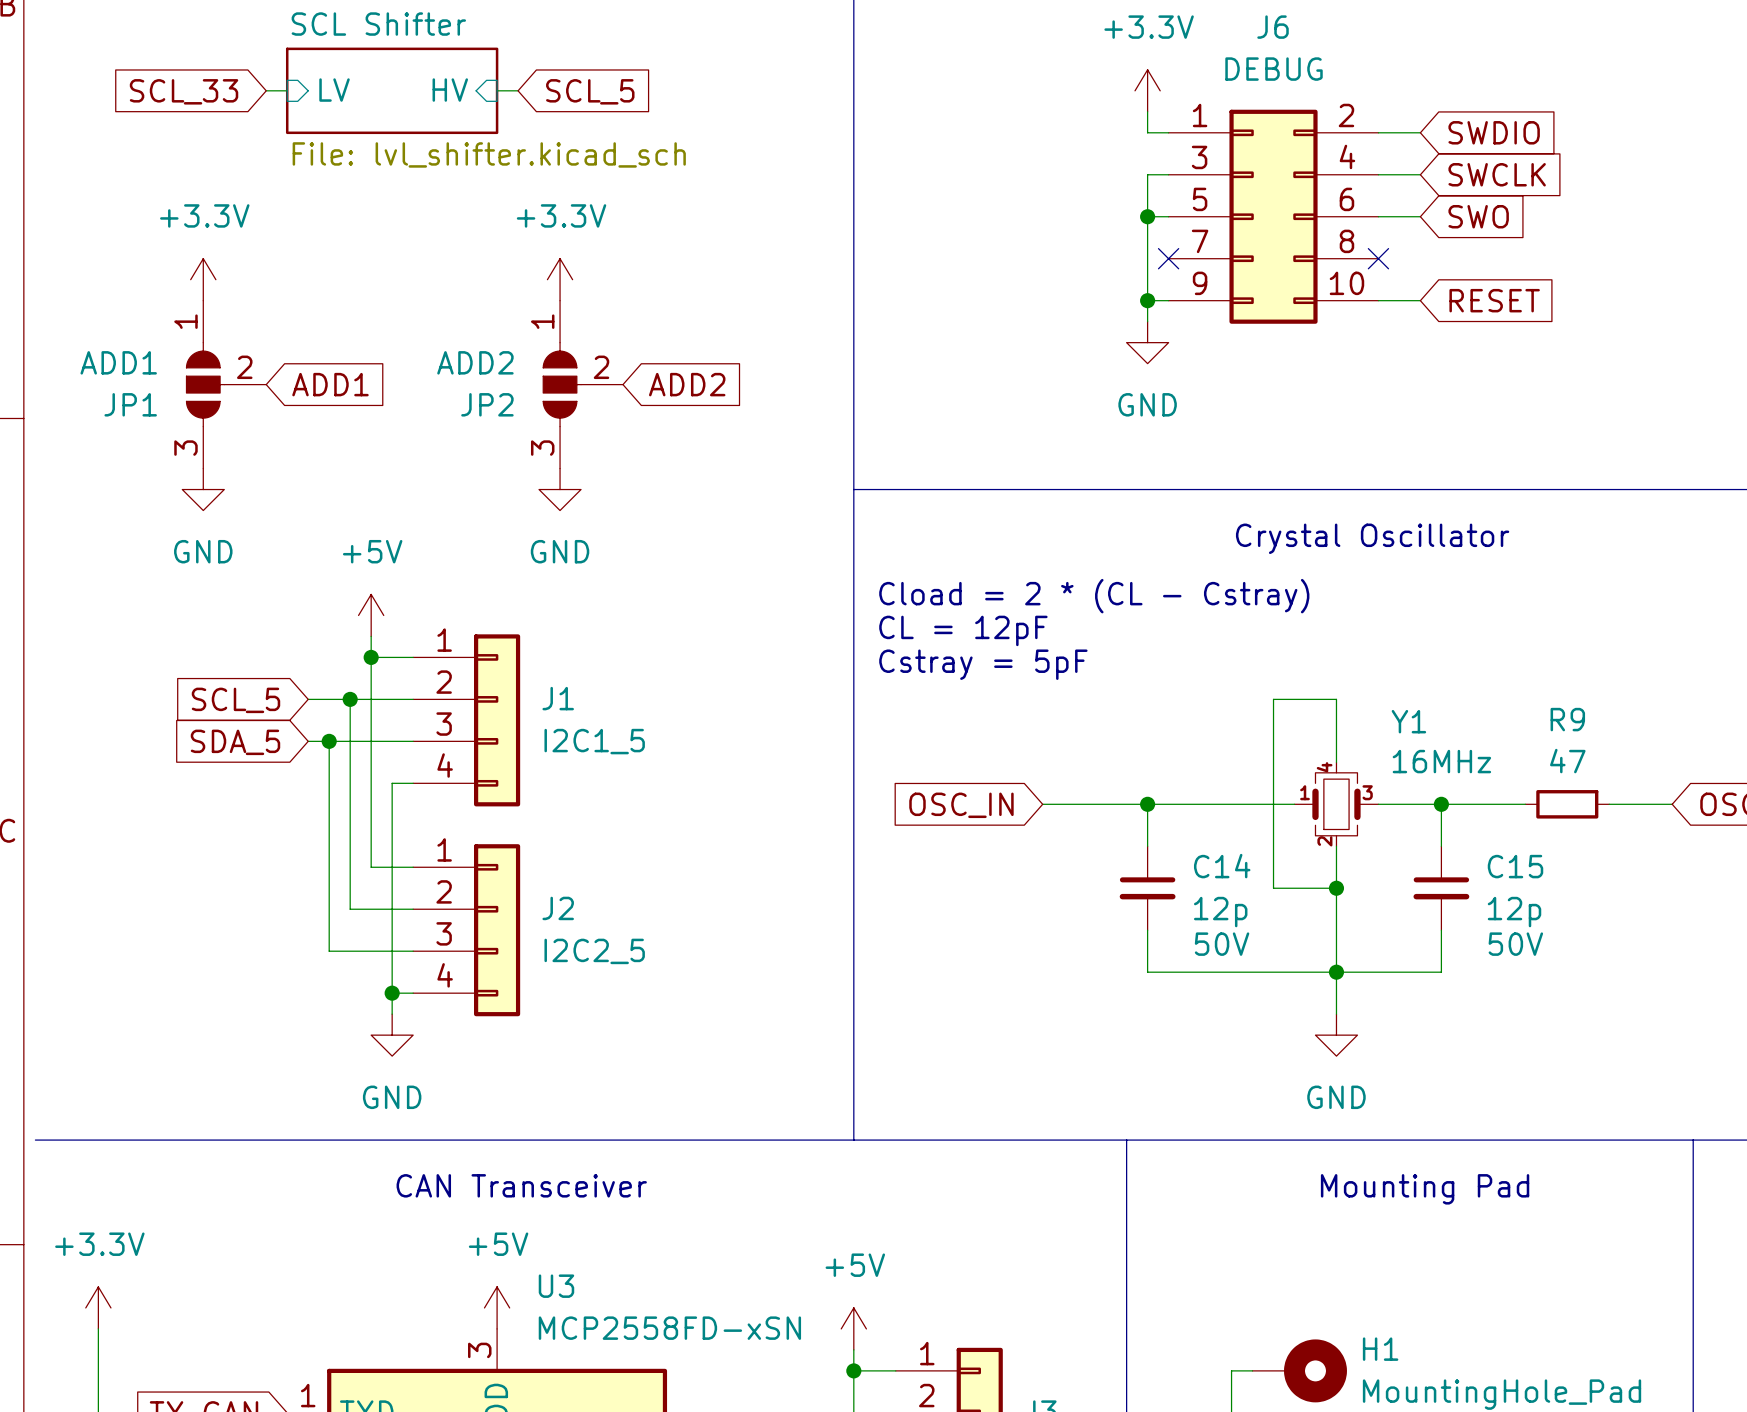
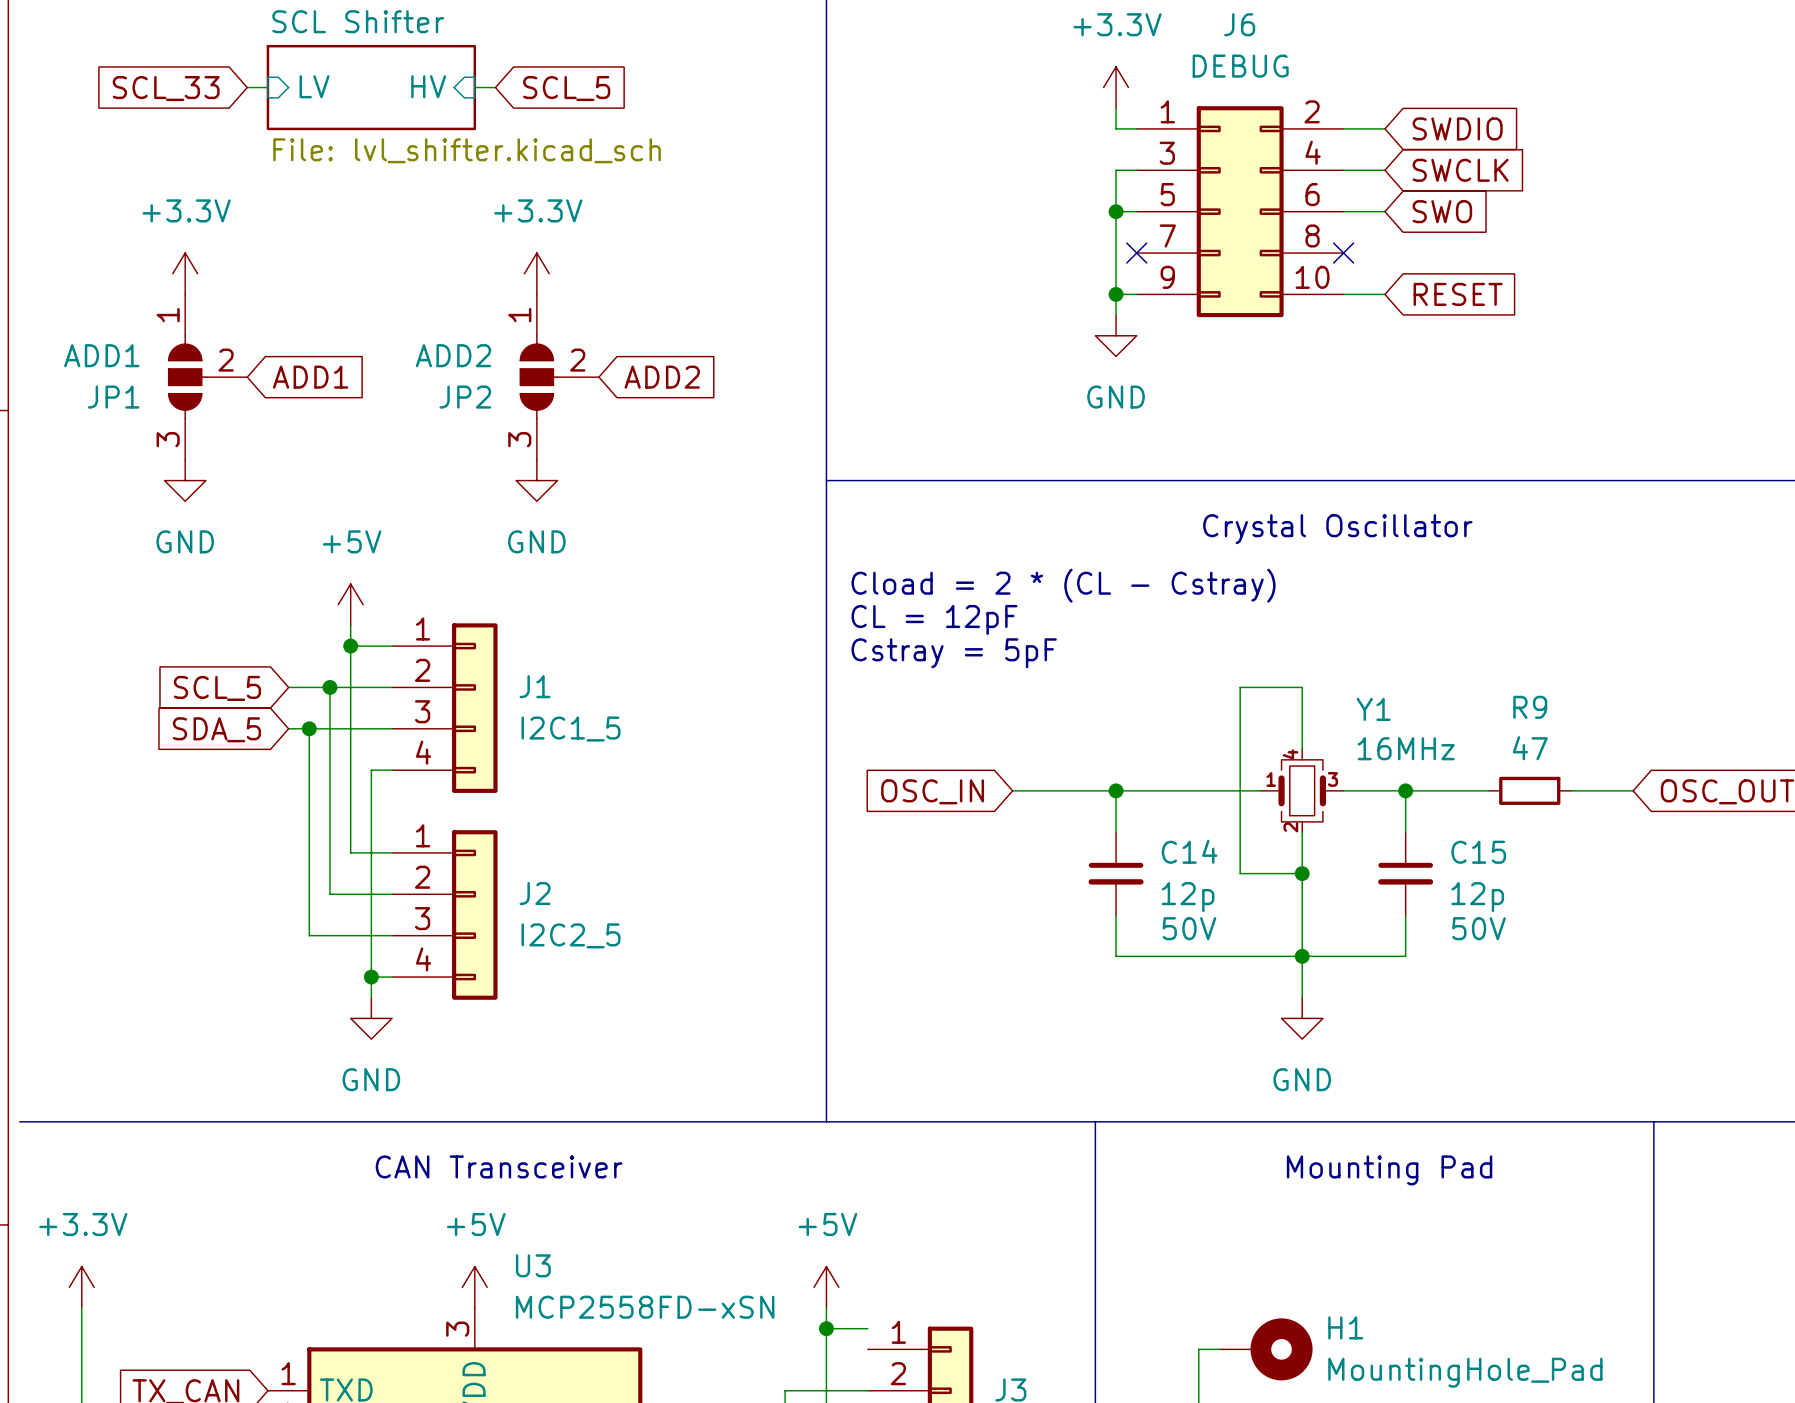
wire: none -> (826, 1308) (826, 1328) (867, 1328)
power symbol position: +5V (853, 1328) -> +5V (826, 1287)
wire: (853, 1370) (895, 1370) -> none
junction position: (853, 1370) -> (826, 1328)

